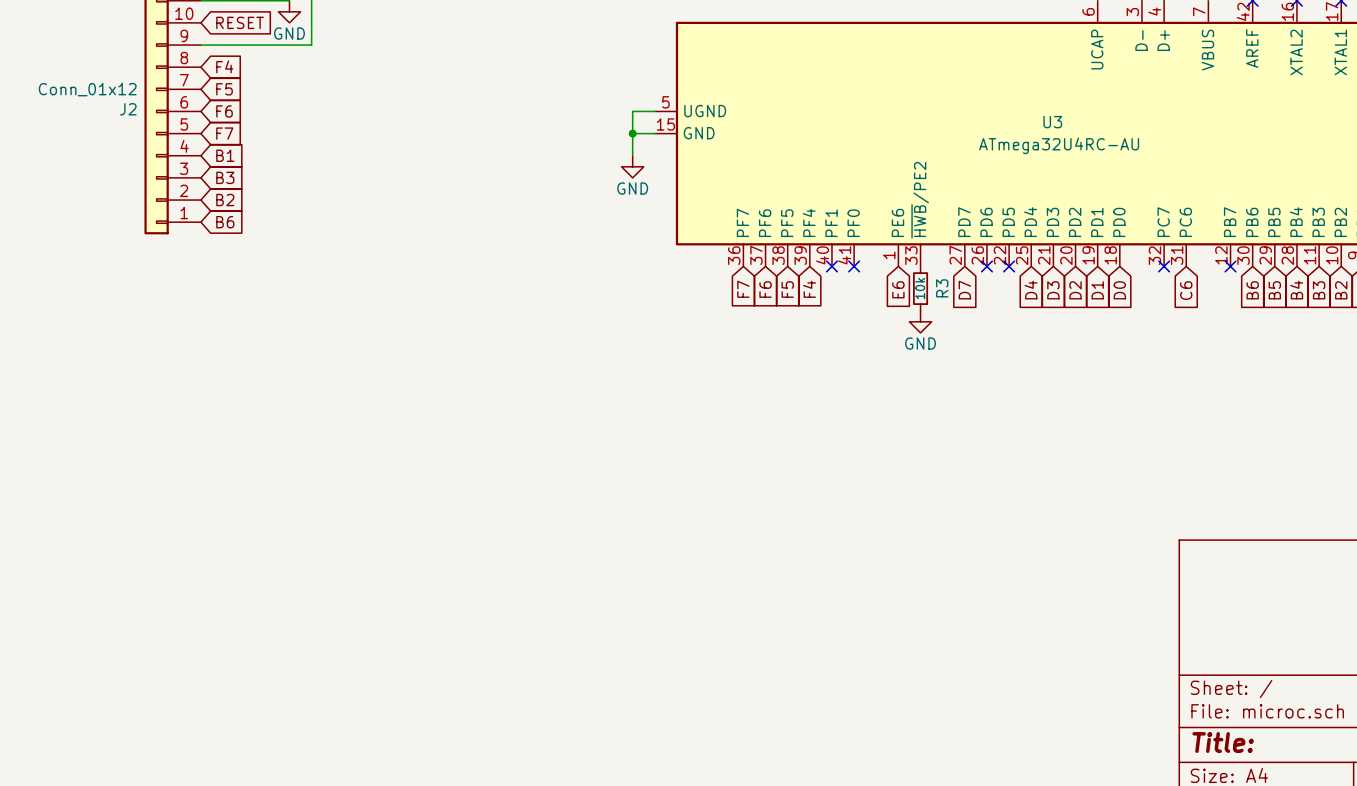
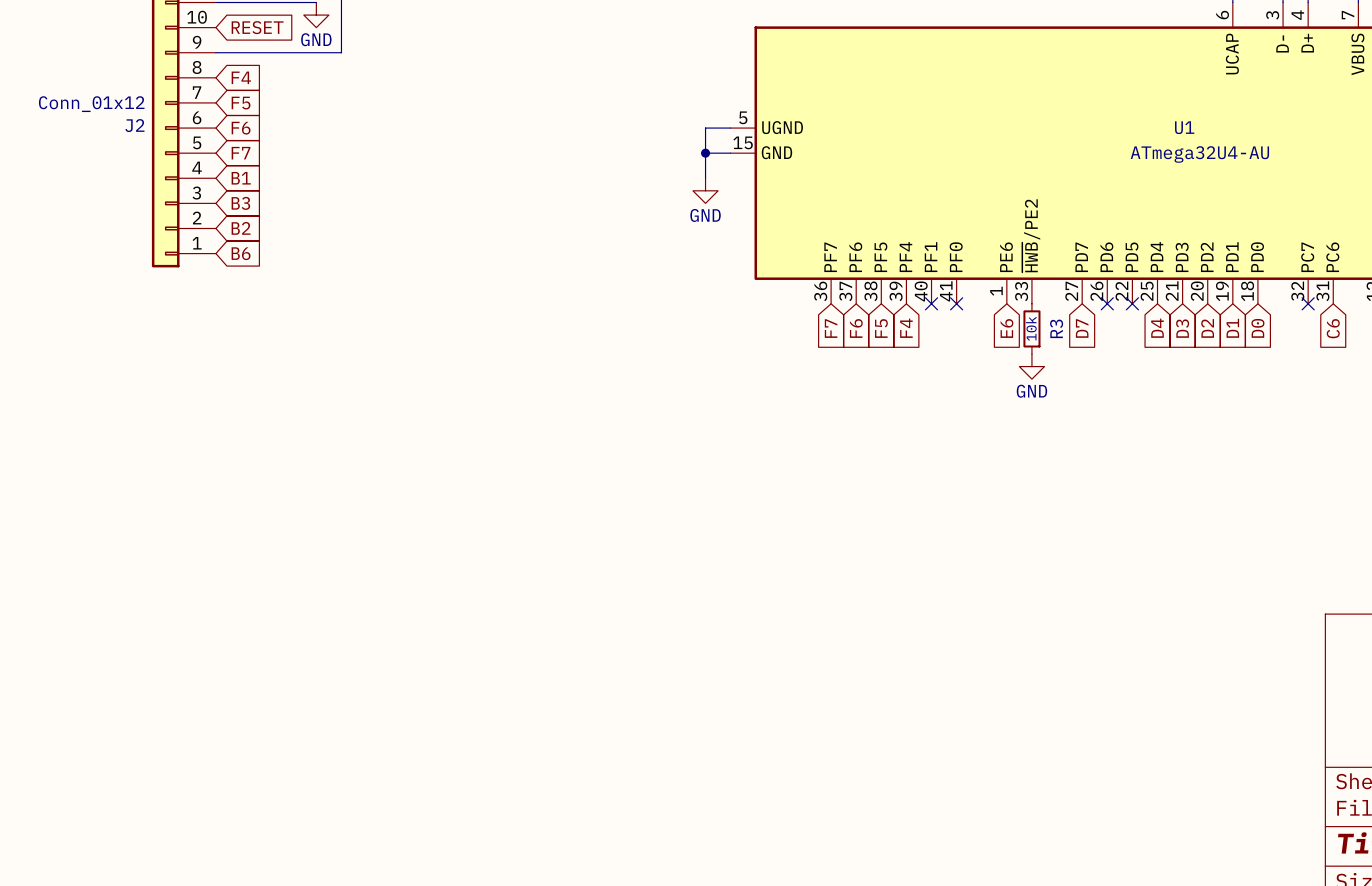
U3 name: U3 (1052, 122) -> U1 (1184, 127)
U3 value: ATmega32U4RC-AU (1059, 145) -> ATmega32U4-AU (1199, 154)

